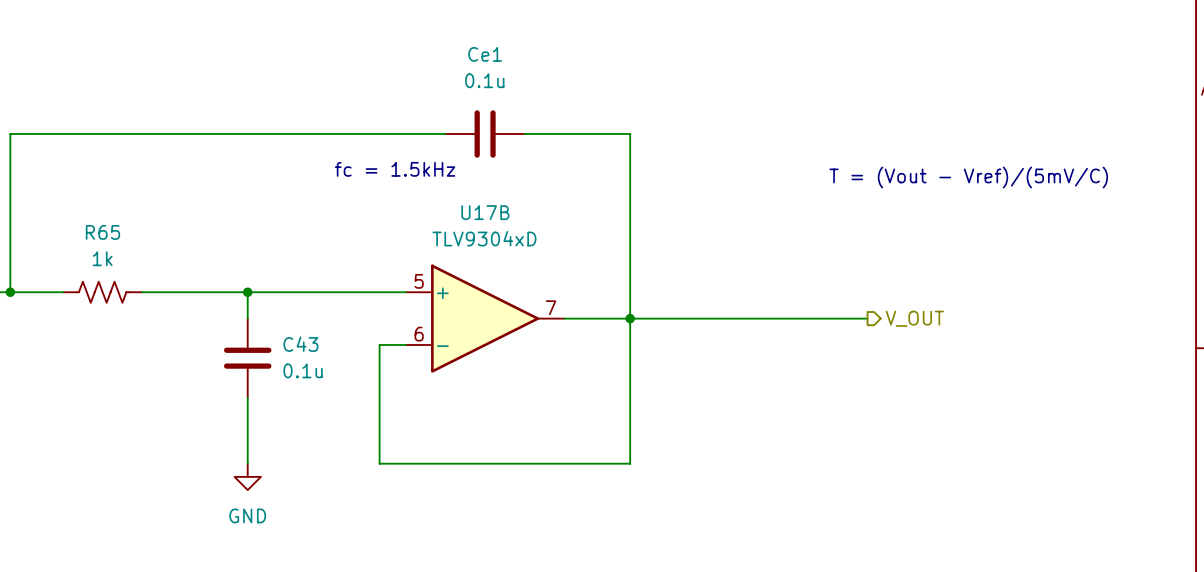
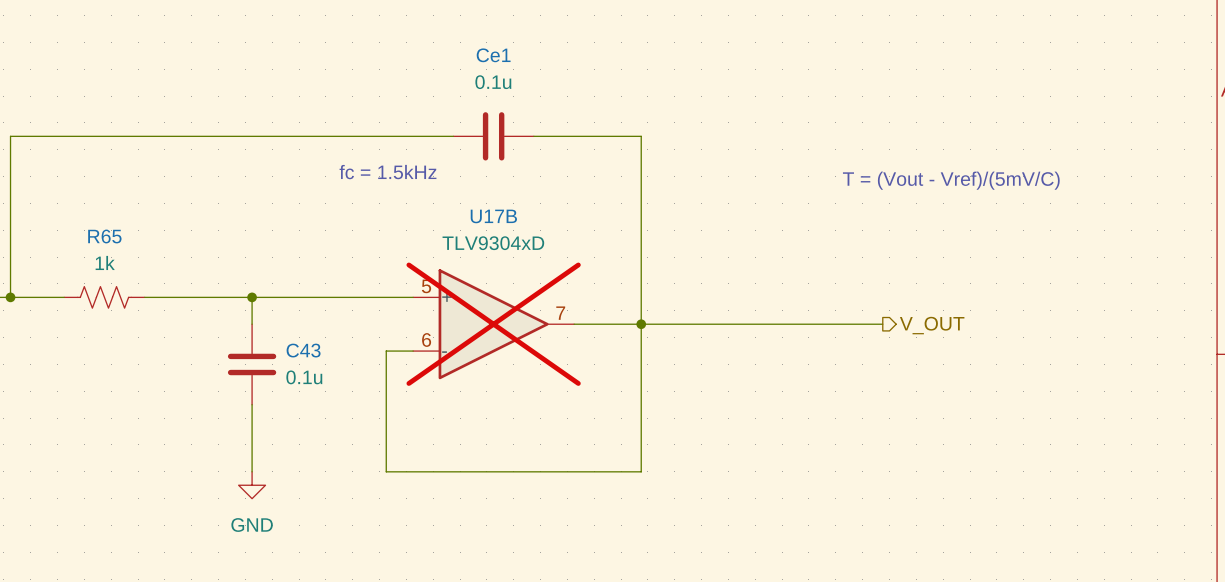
U17B do-not-place cross: none -> (493, 324)

